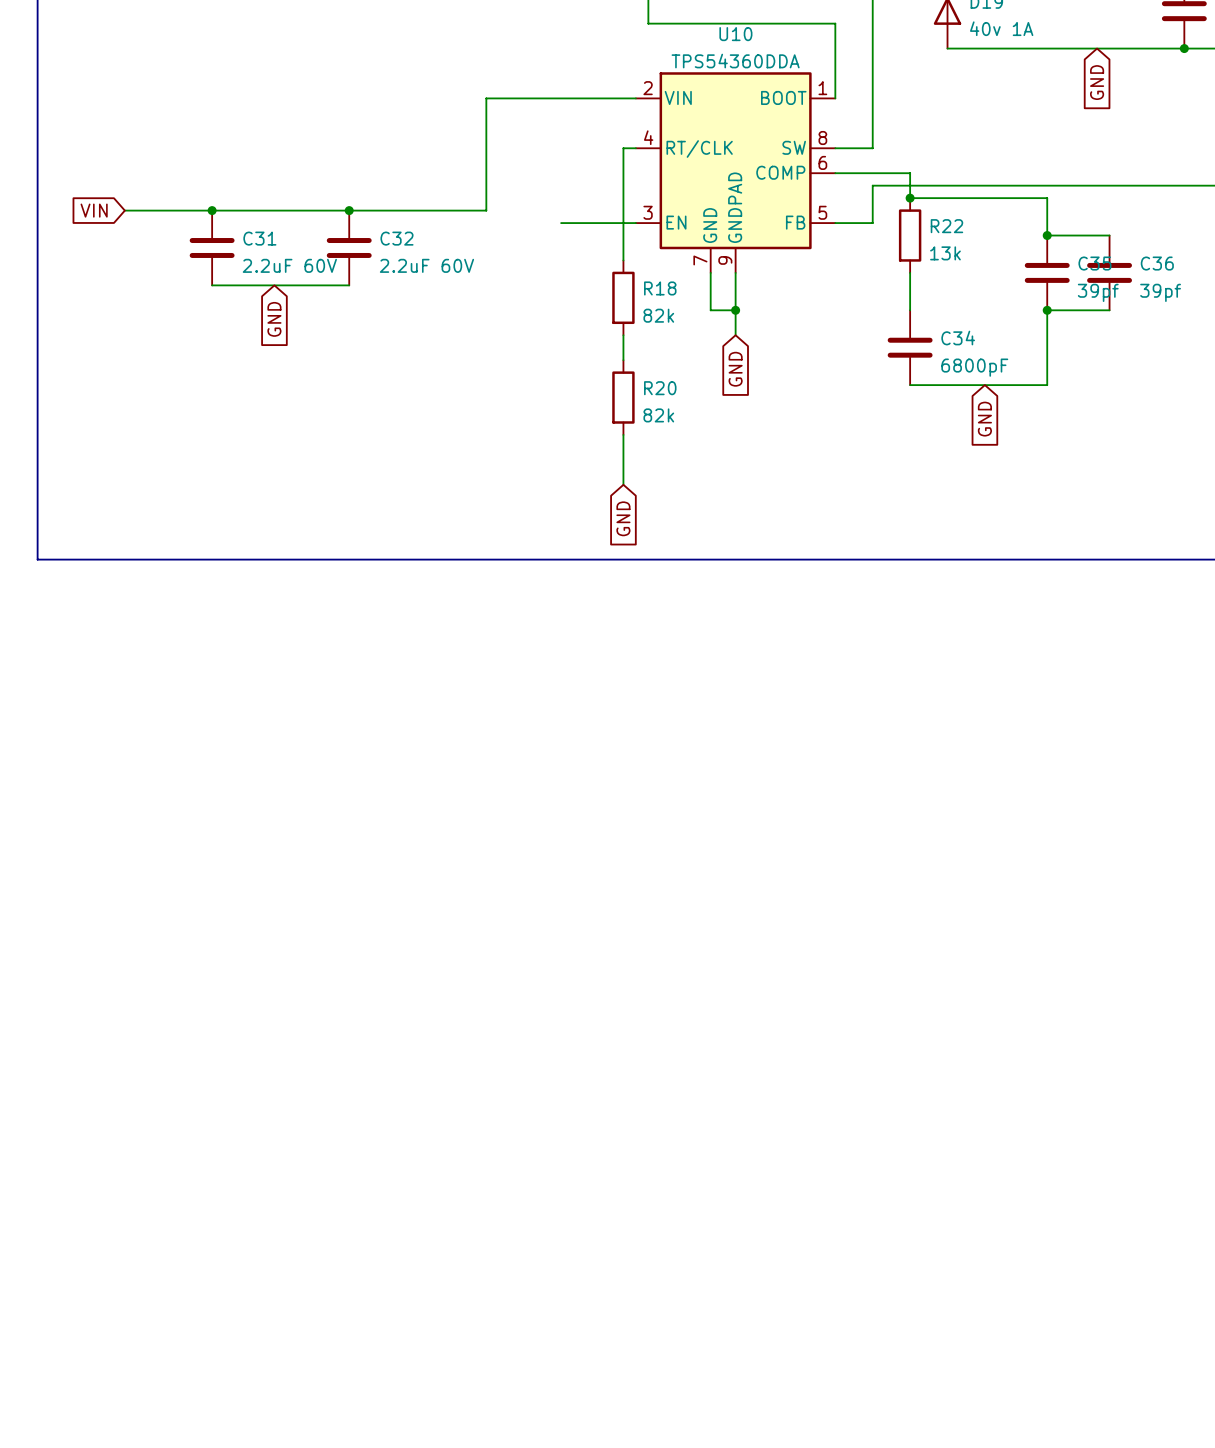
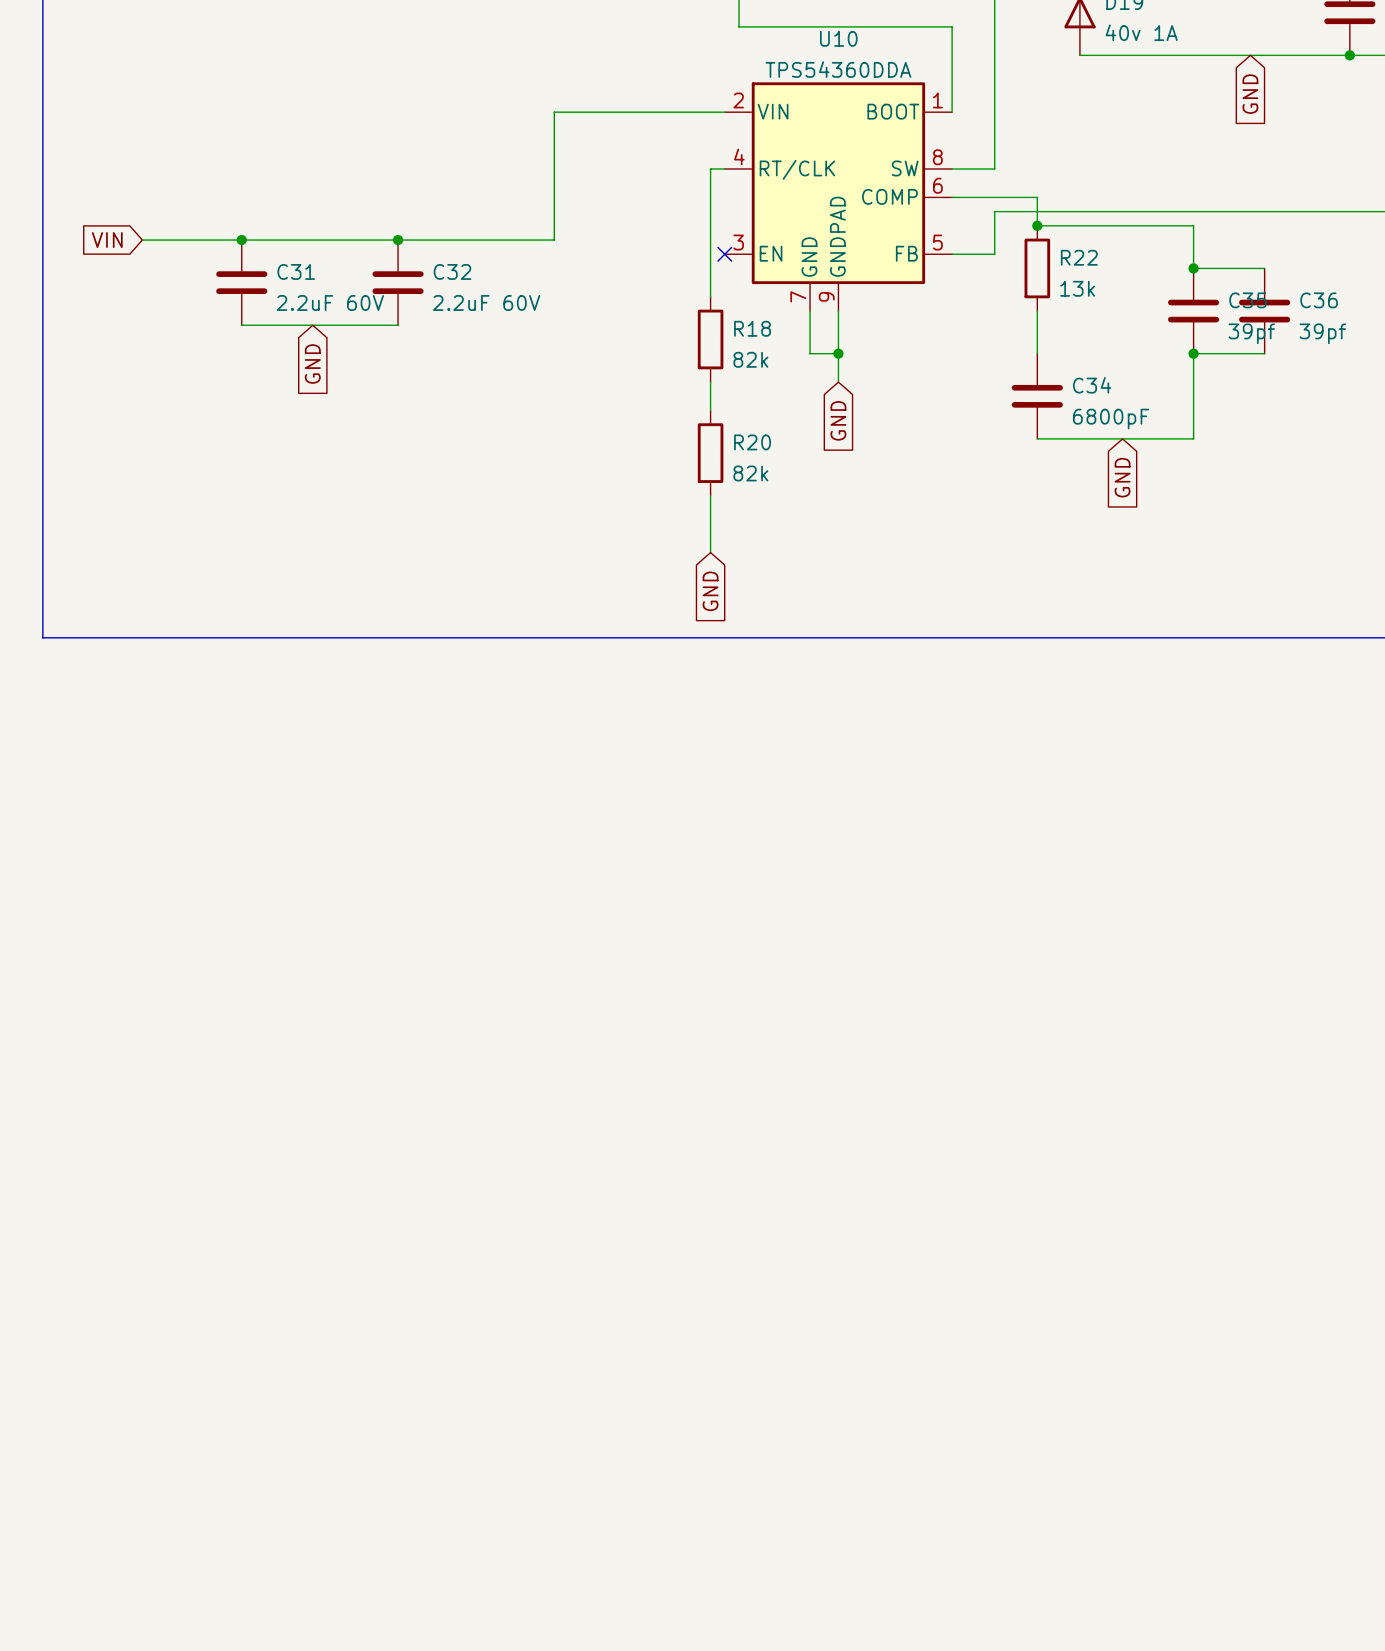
wire: (561, 223) (635, 223) -> none
no-connect mark: none -> (724, 254)

